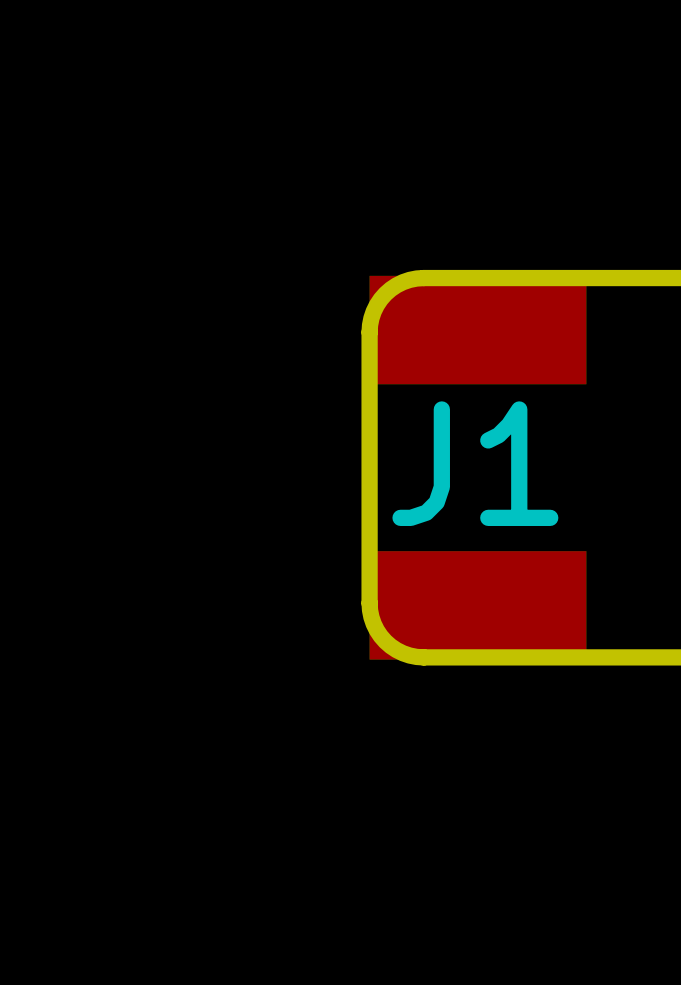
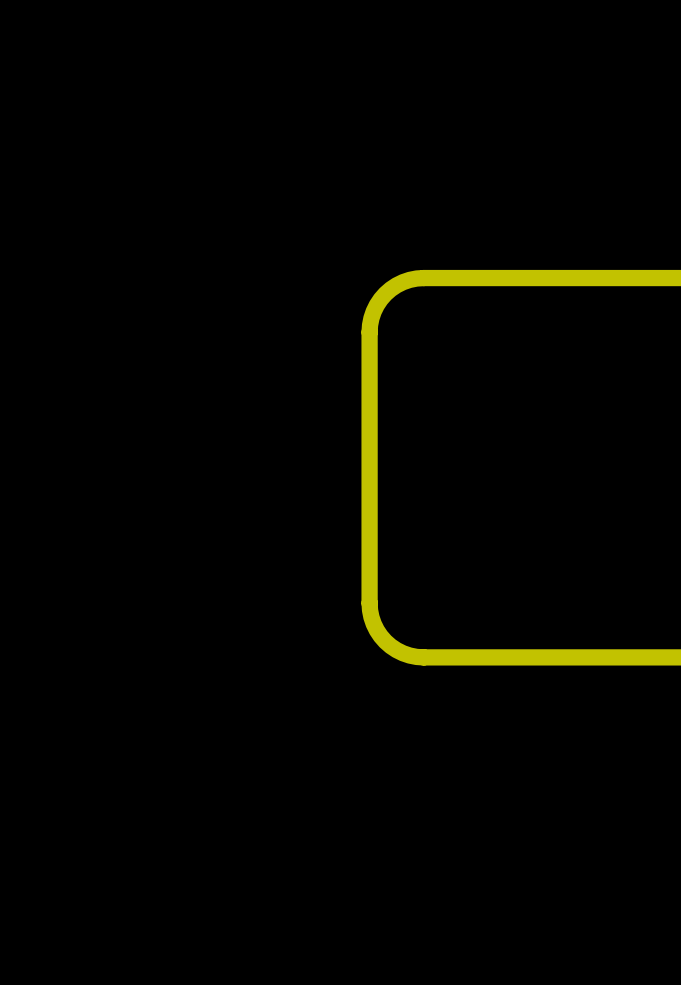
J1: (477, 467) -> none

